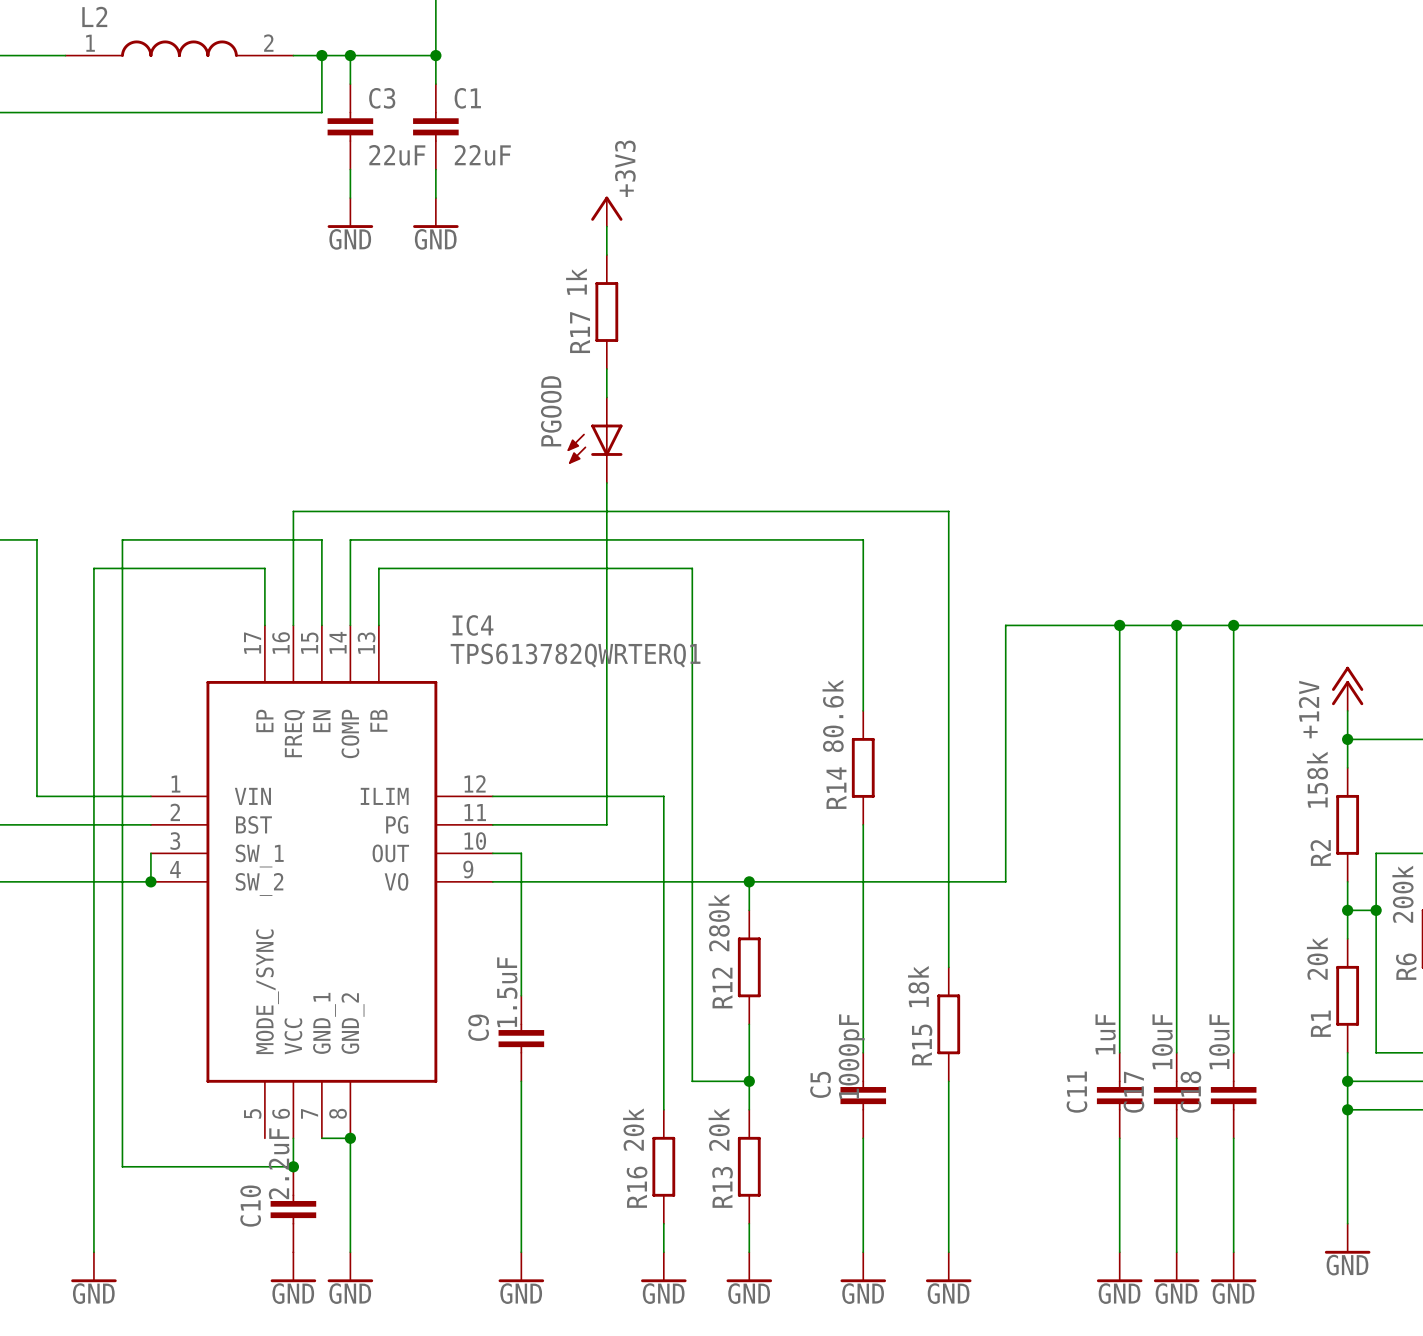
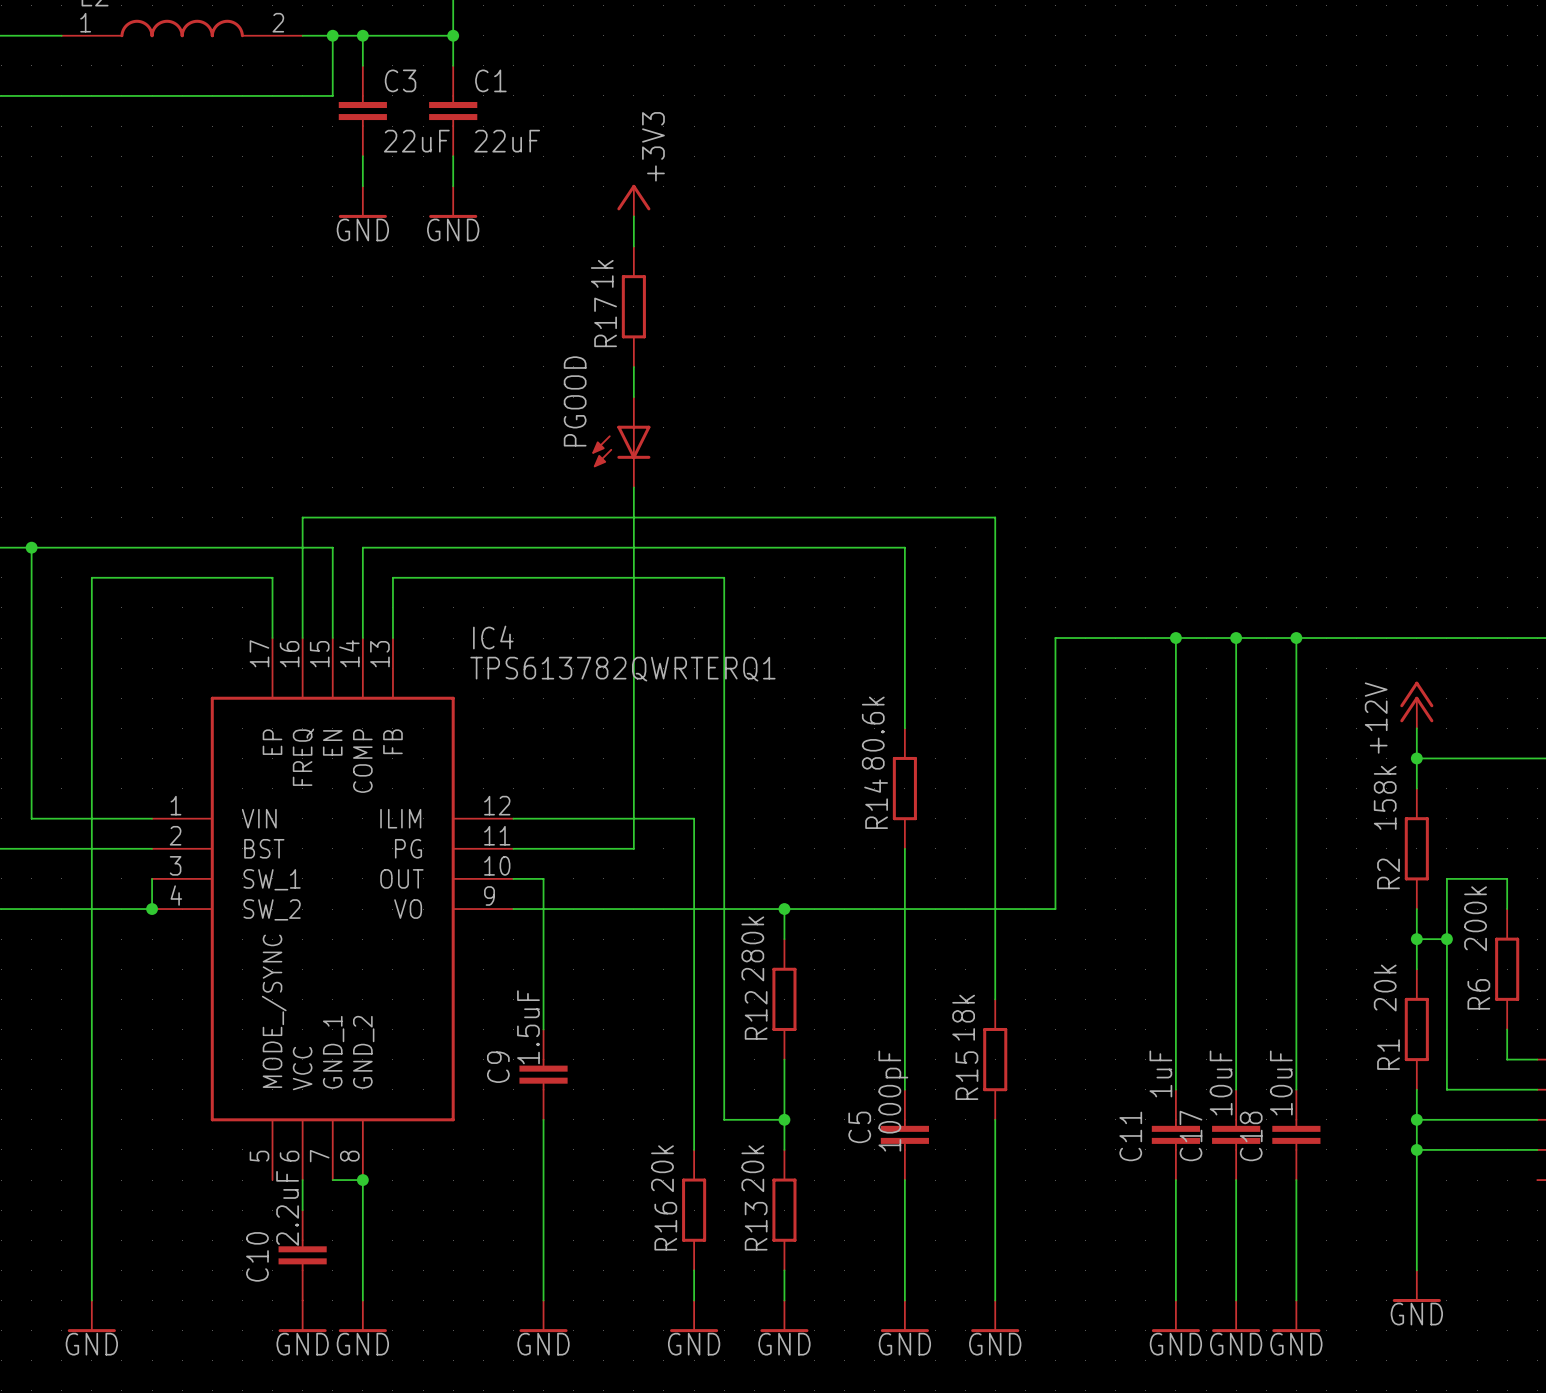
junction: none -> (31, 547)
wire: (122, 539) (122, 1166) (293, 1166) -> (121, 547) (31, 547)
junction: (293, 1166) -> none

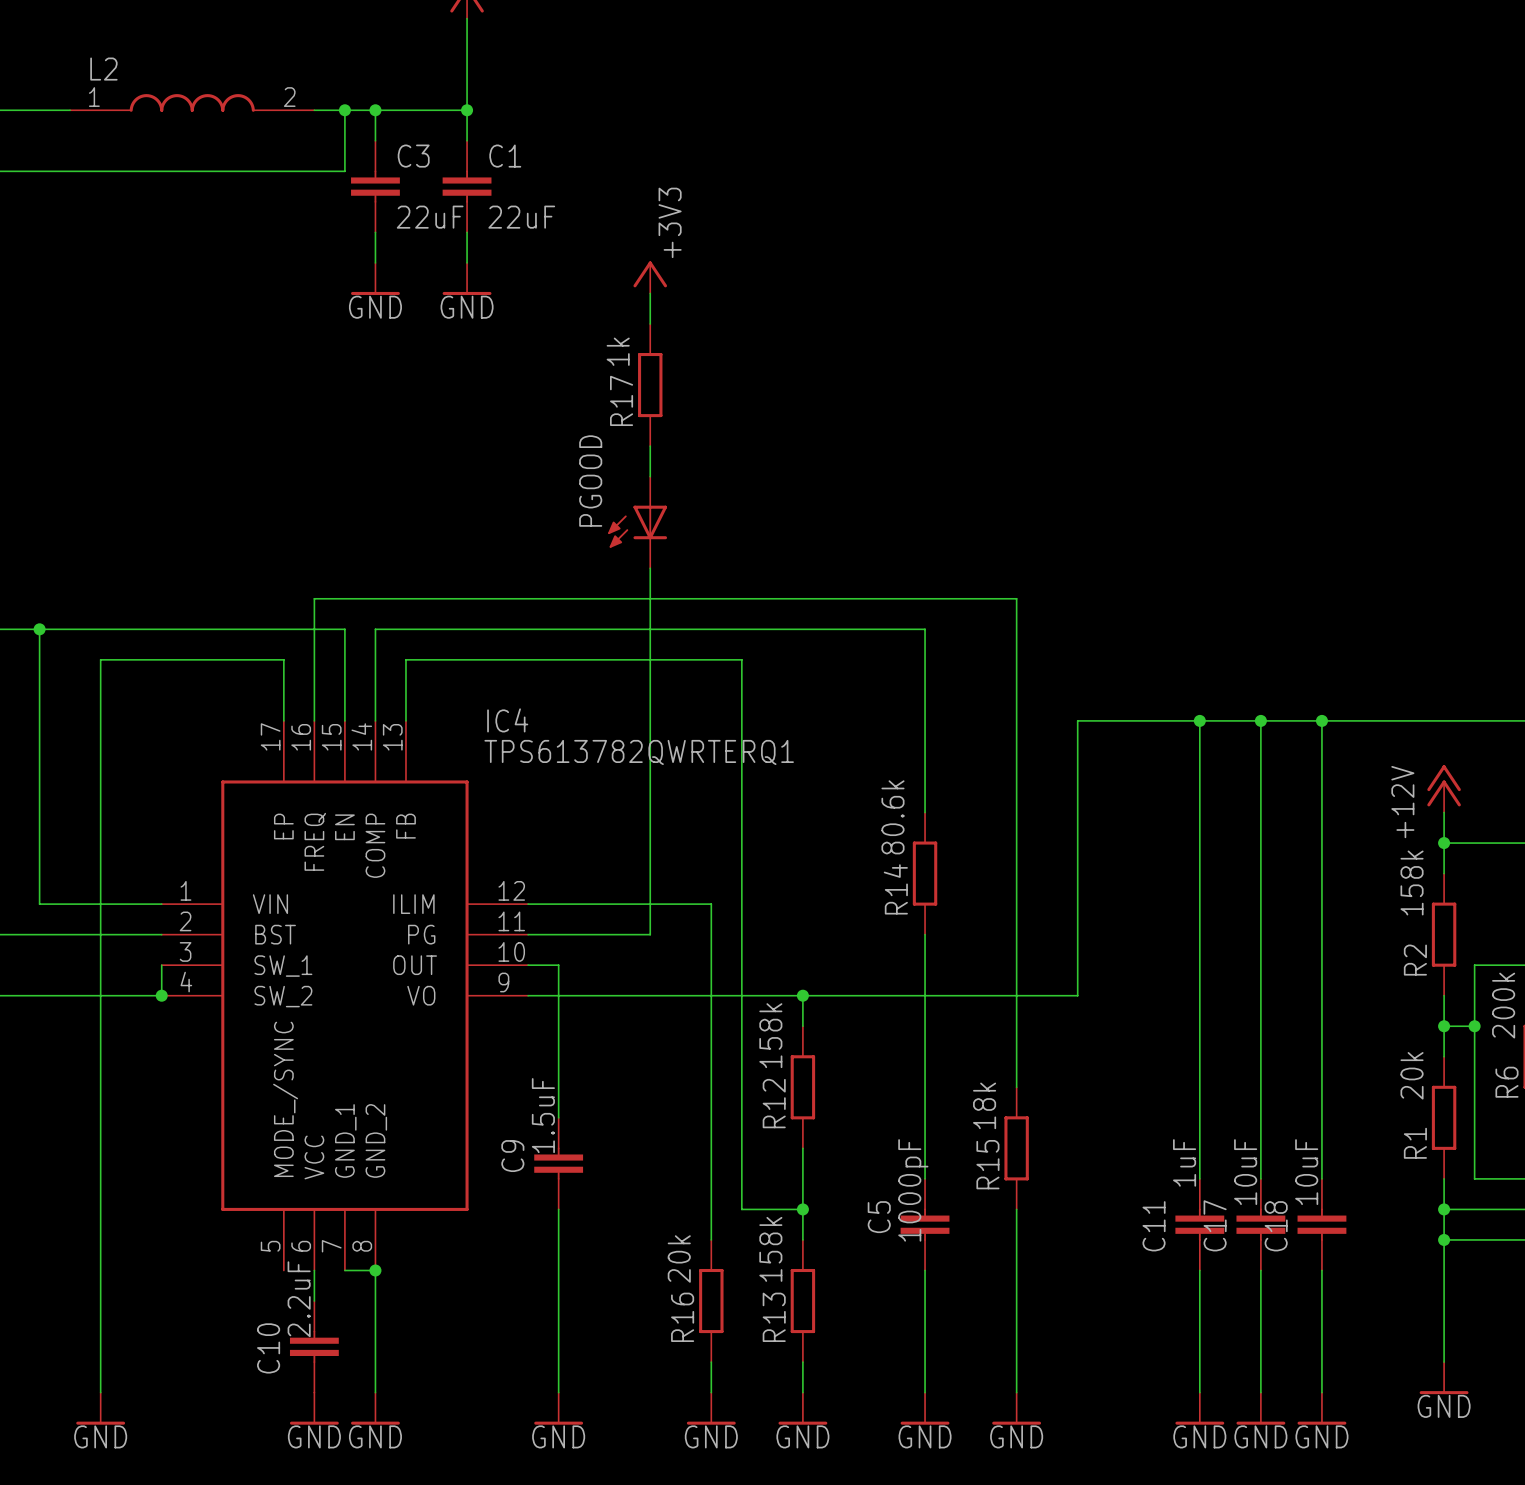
R12 value: 280k (752, 948) -> 158k (770, 1035)
R13 value: 20k (752, 1168) -> 158k (770, 1249)

